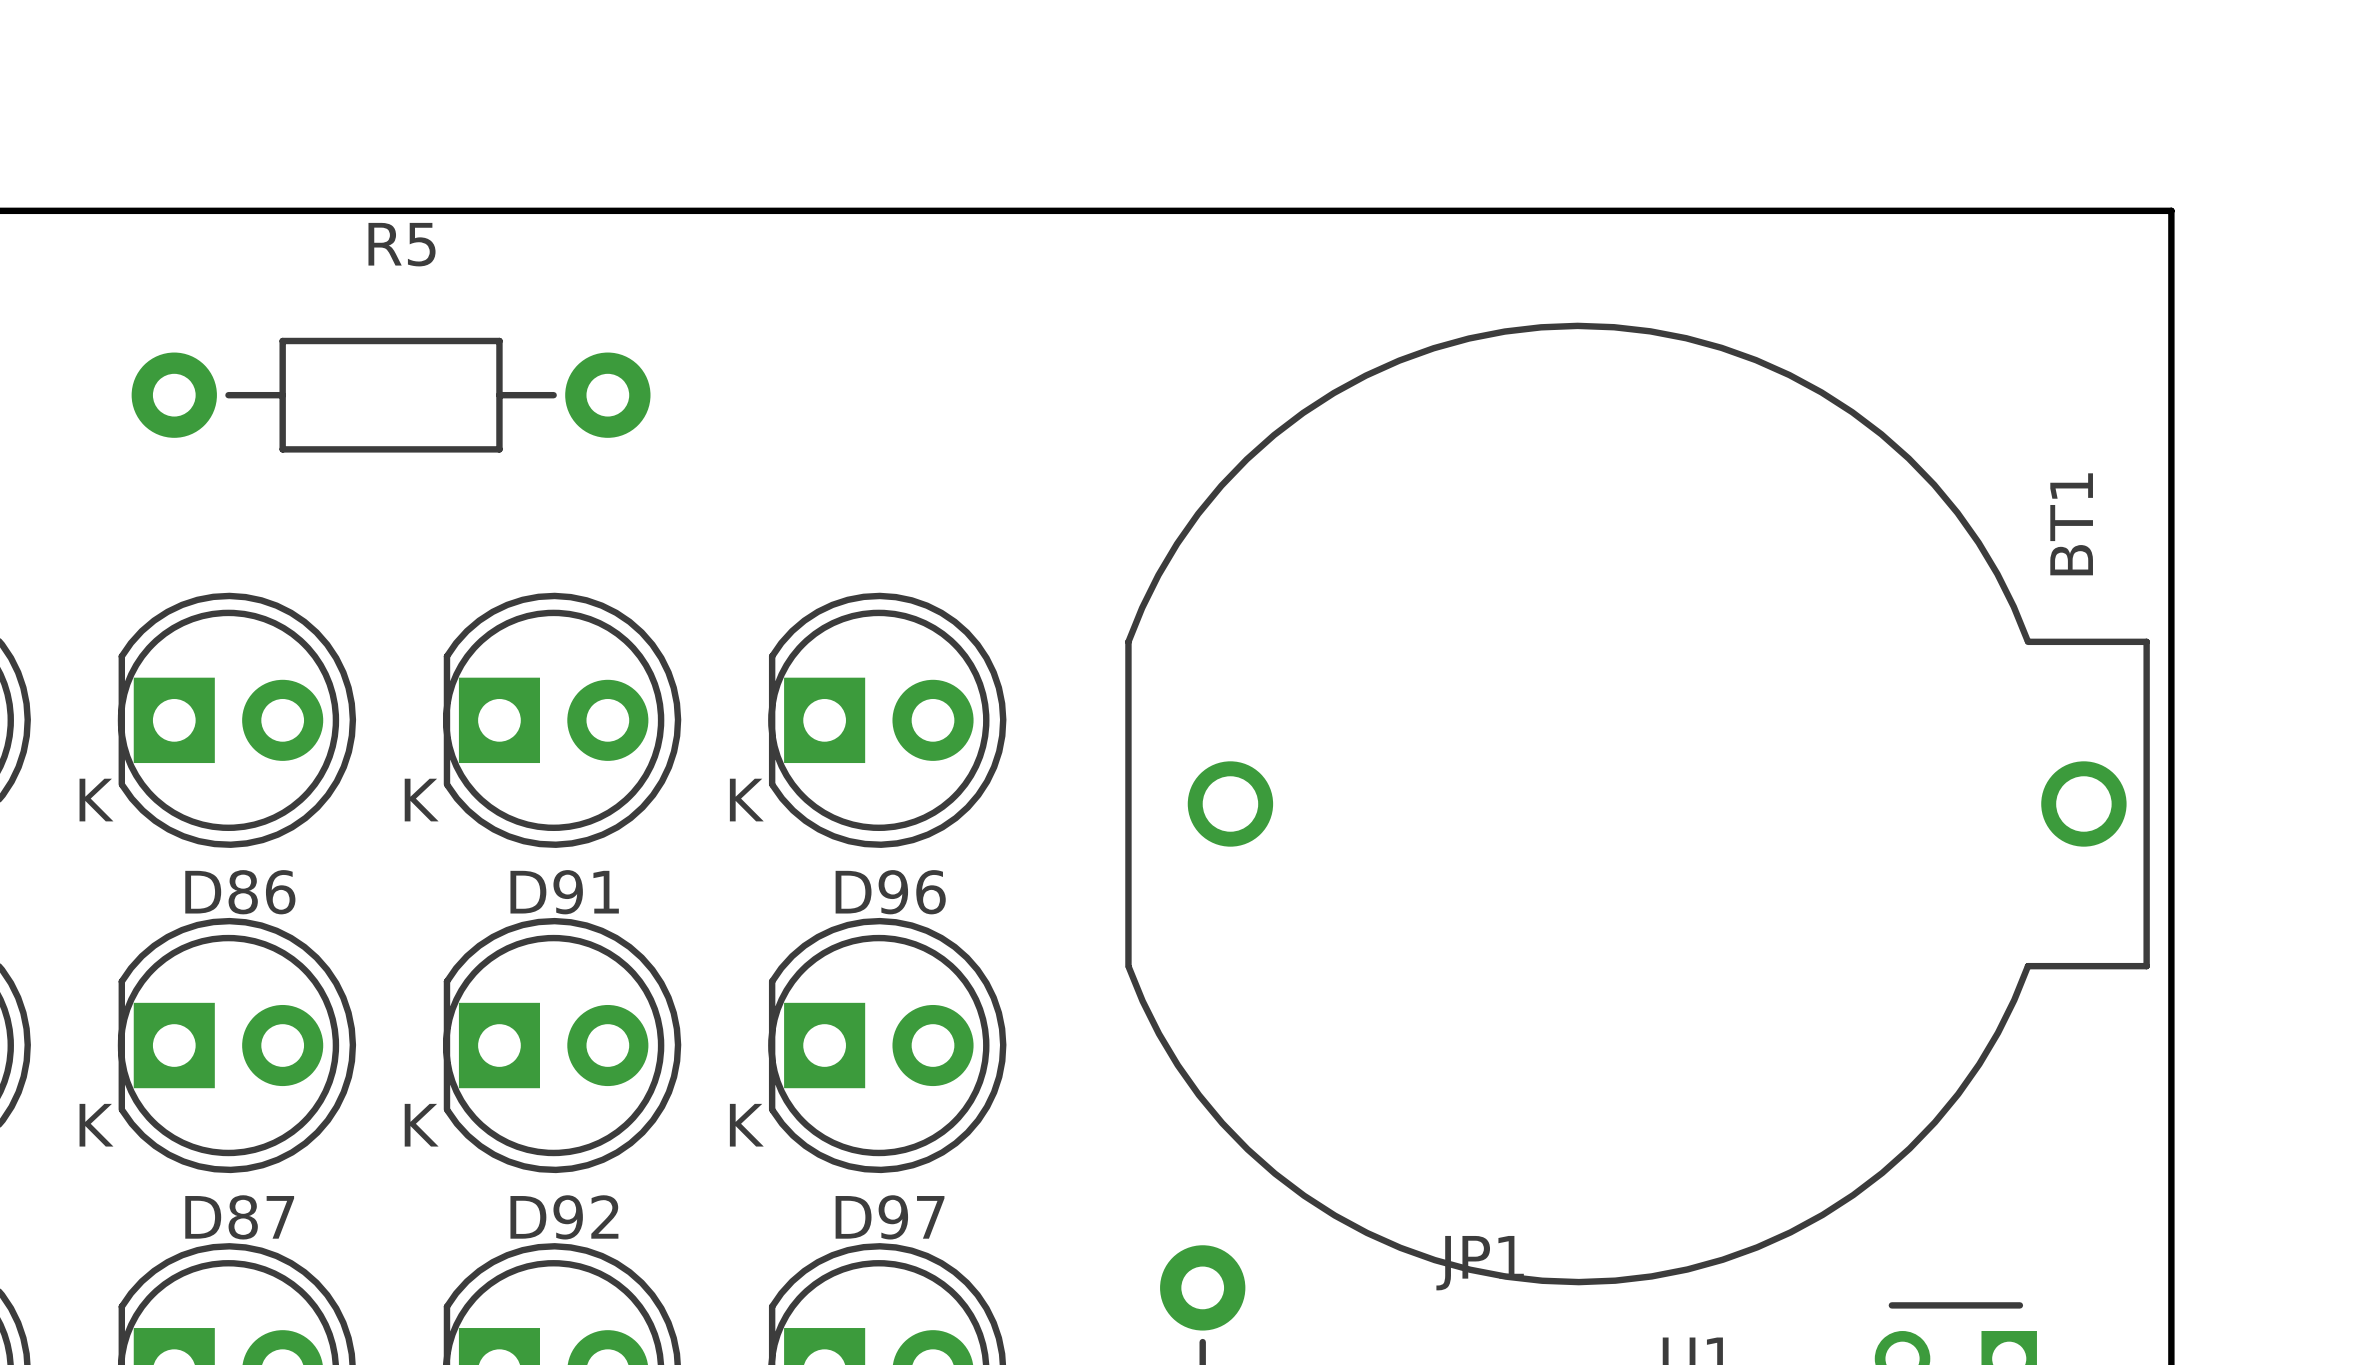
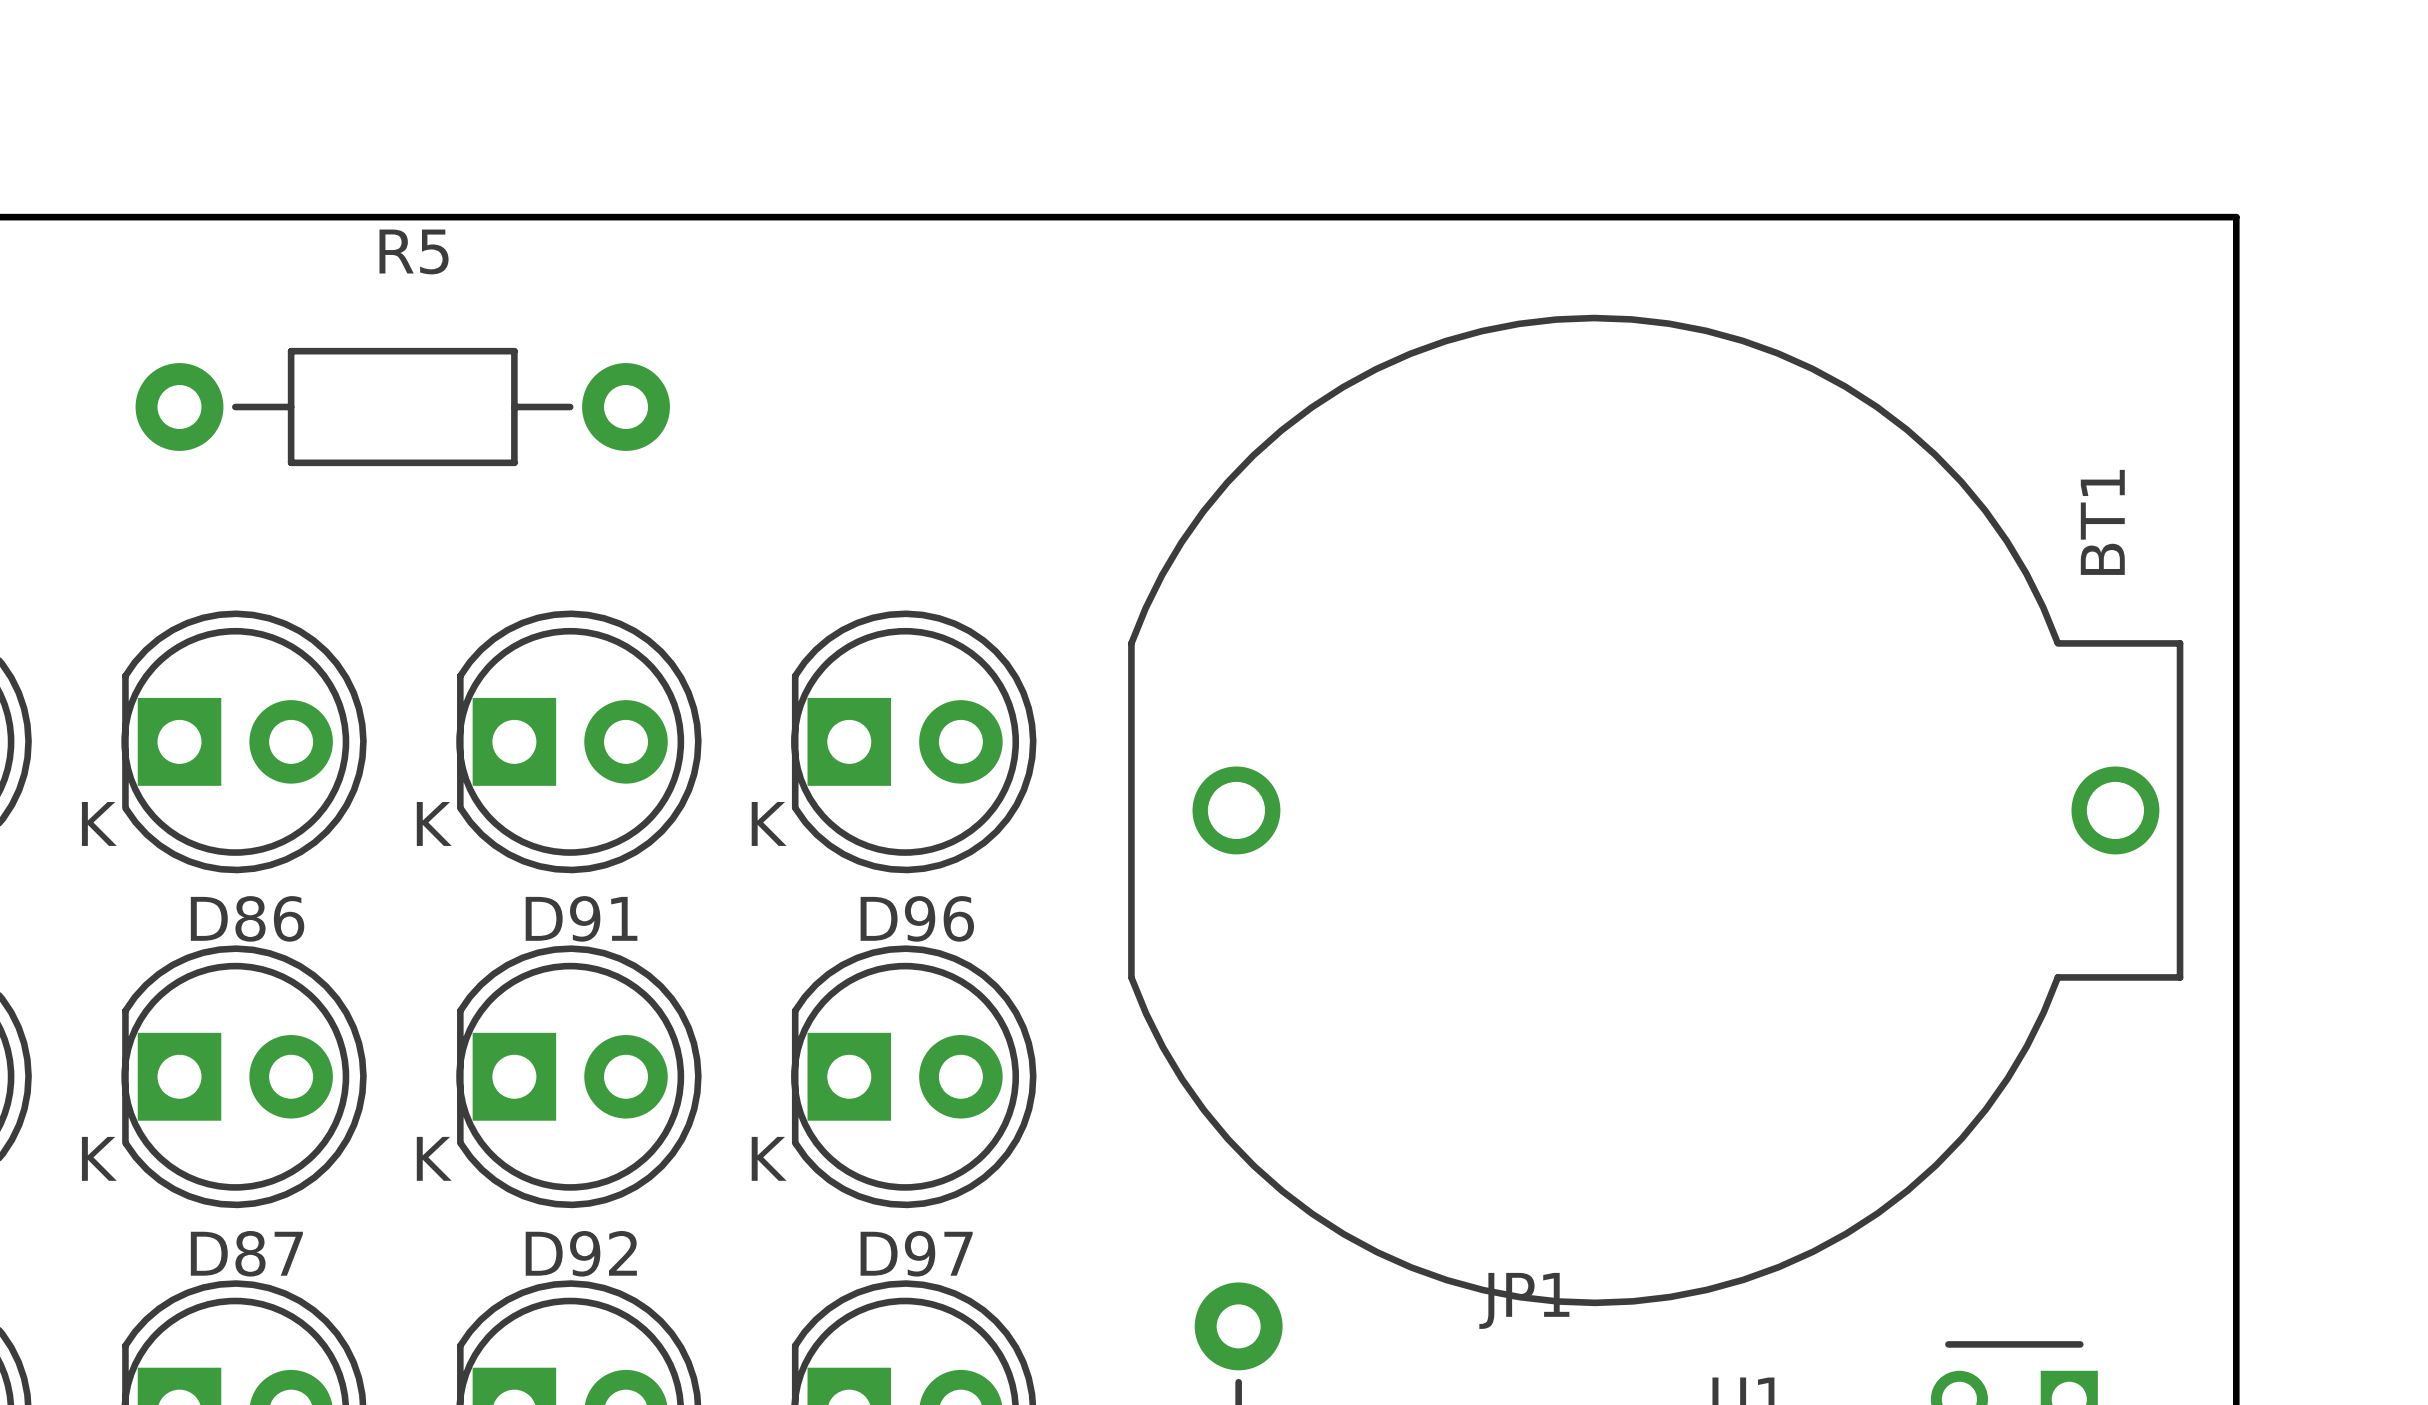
BT1 position: (1637, 803) -> (1655, 810)

